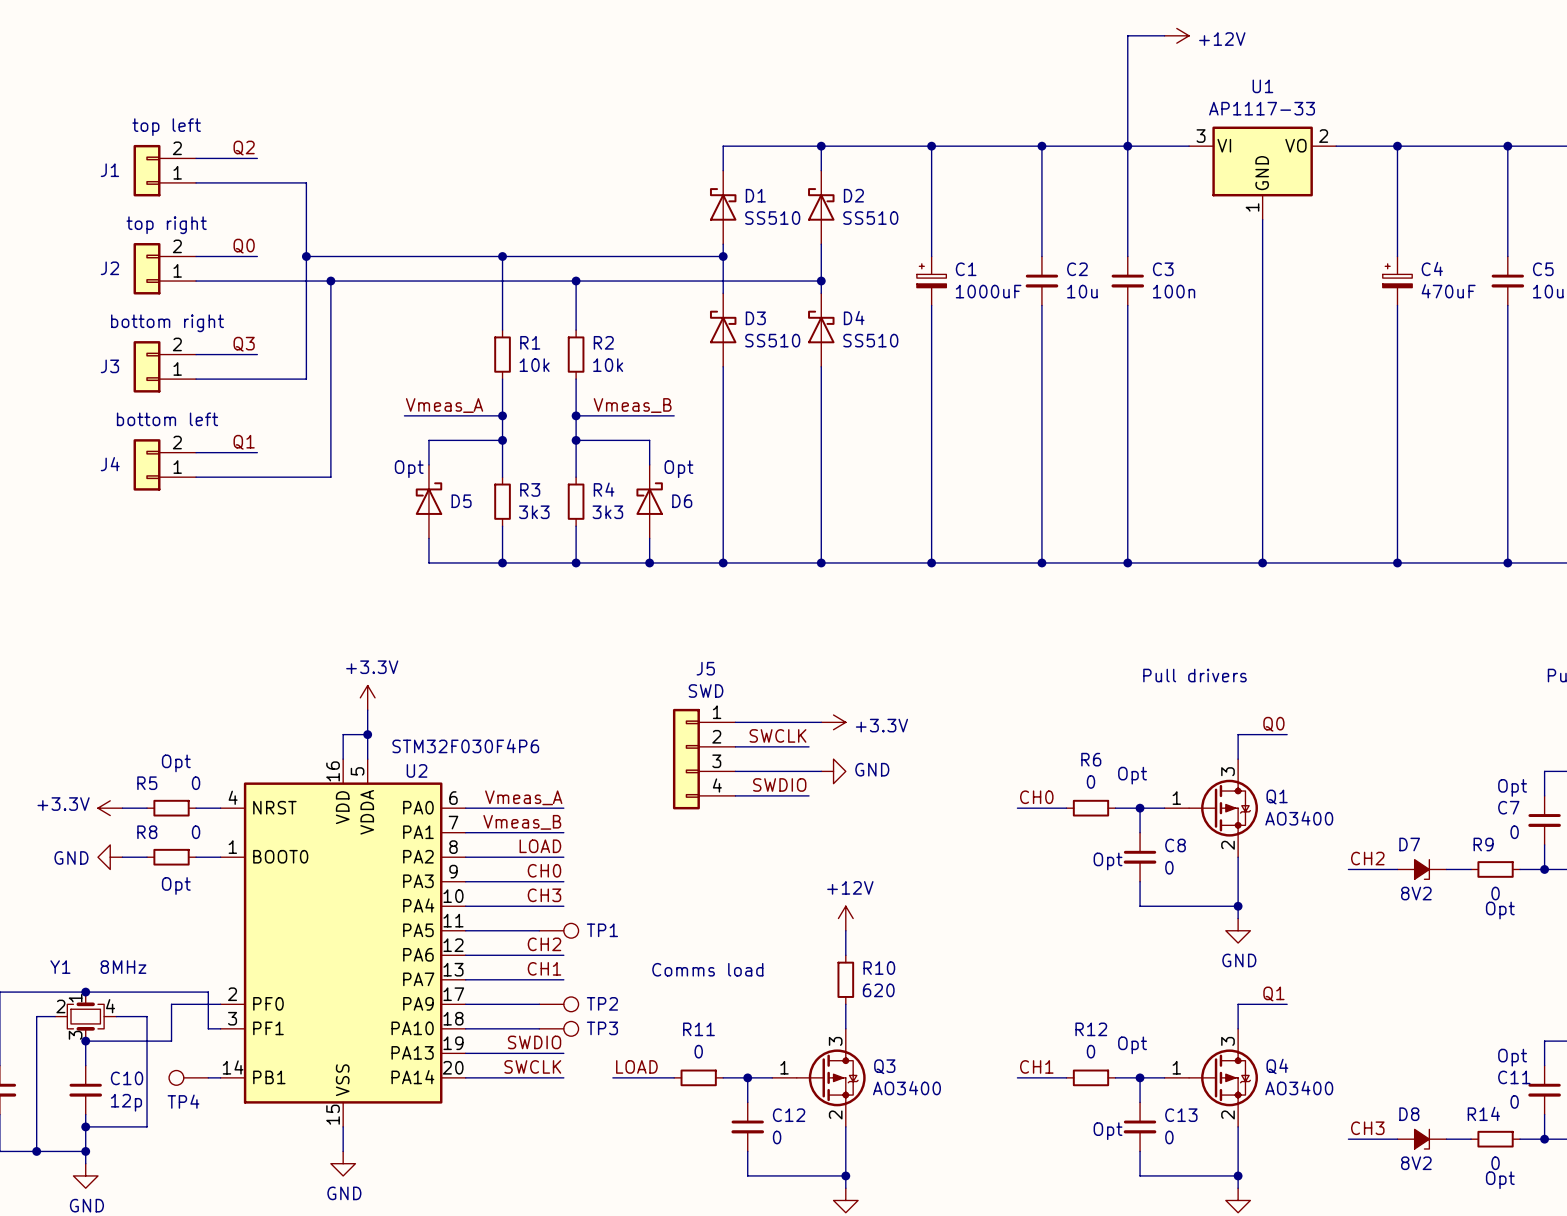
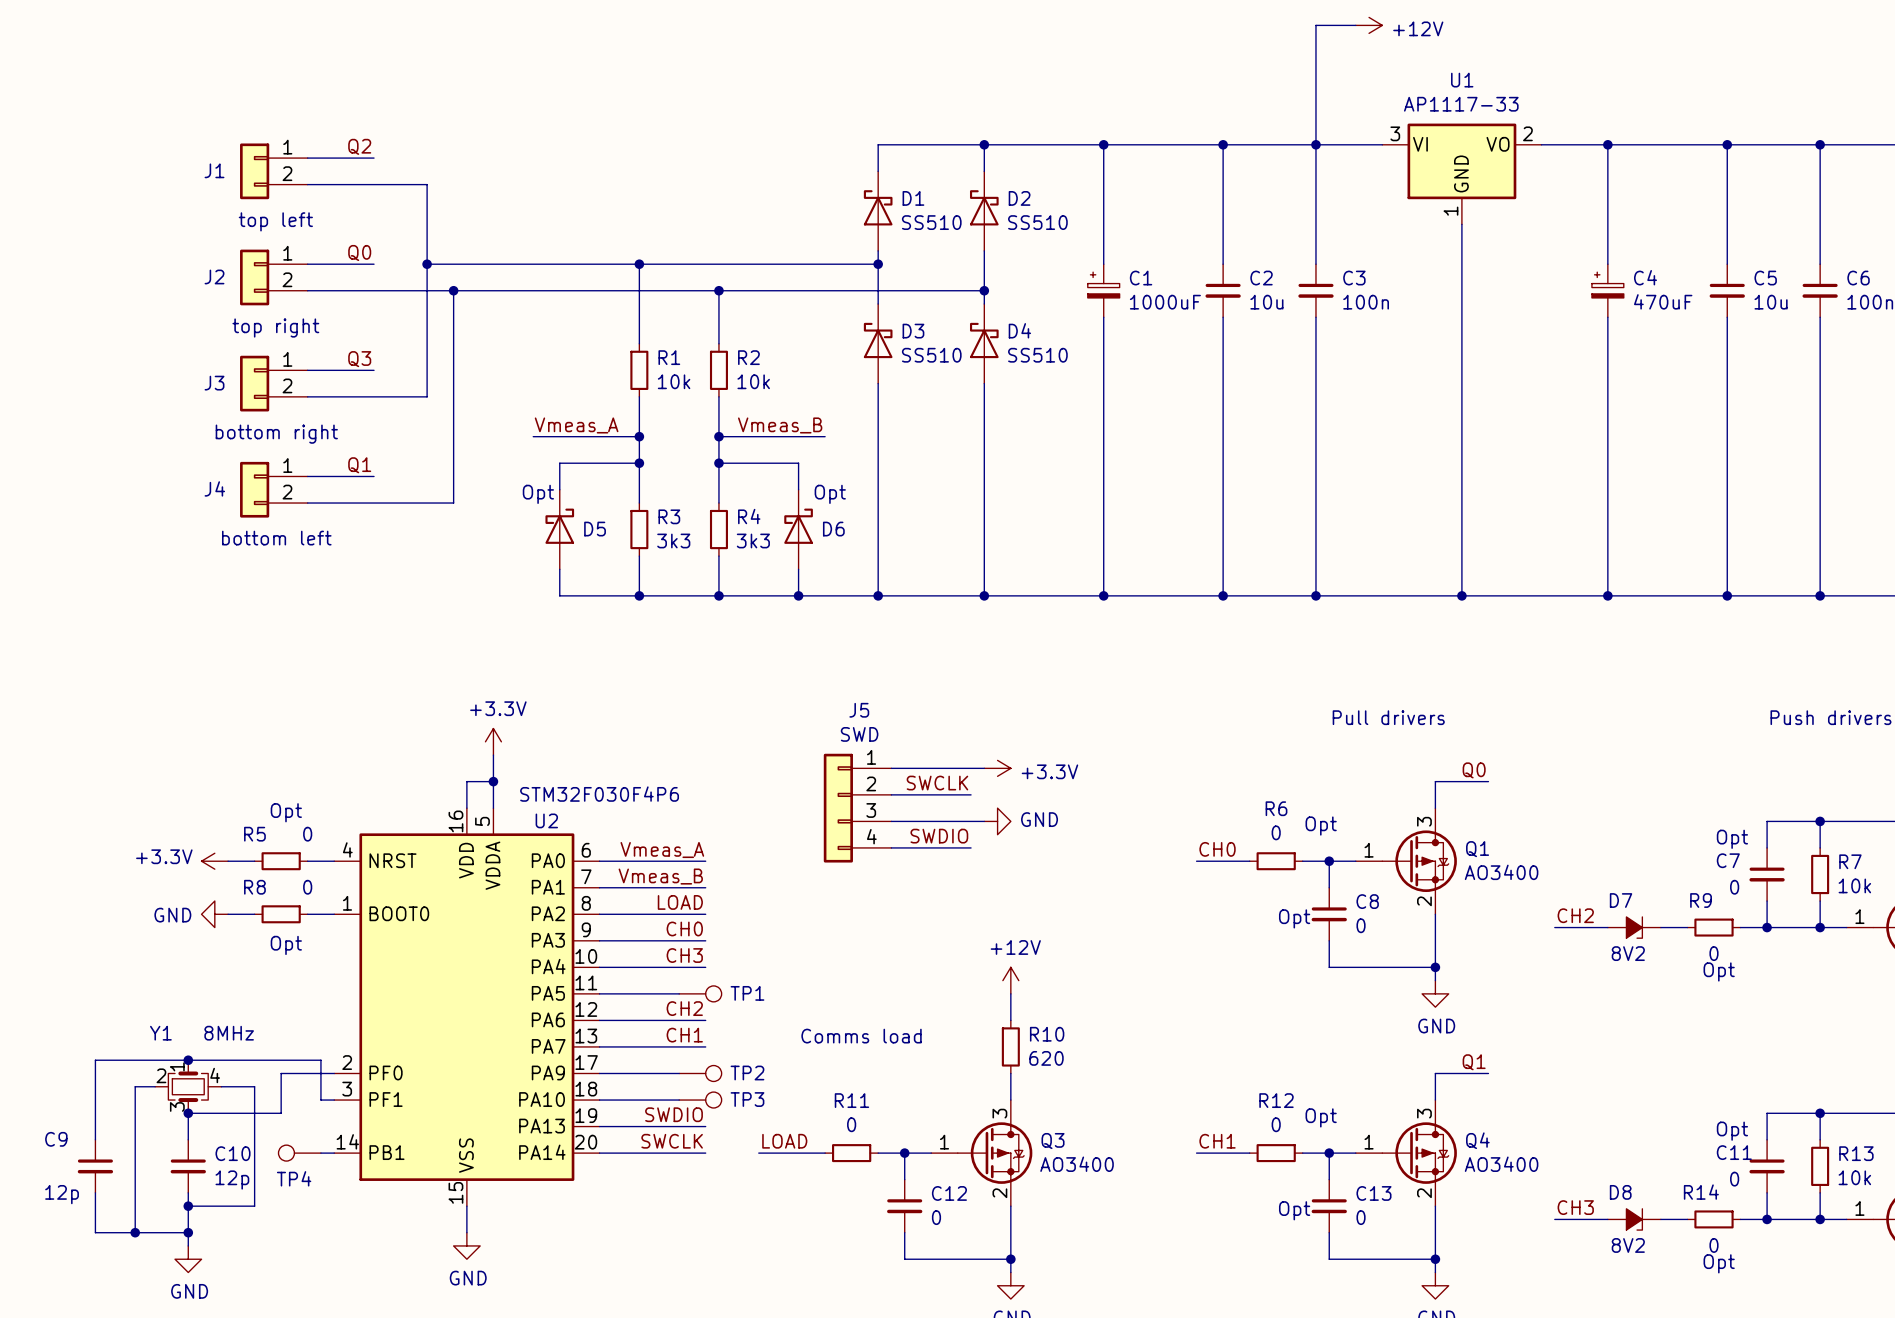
J1 flip: as is (147, 170) -> up-down (254, 171)
J2 flip: as is (147, 268) -> up-down (254, 277)
J3 flip: as is (147, 366) -> up-down (254, 383)
J4 flip: as is (147, 464) -> up-down (254, 489)

